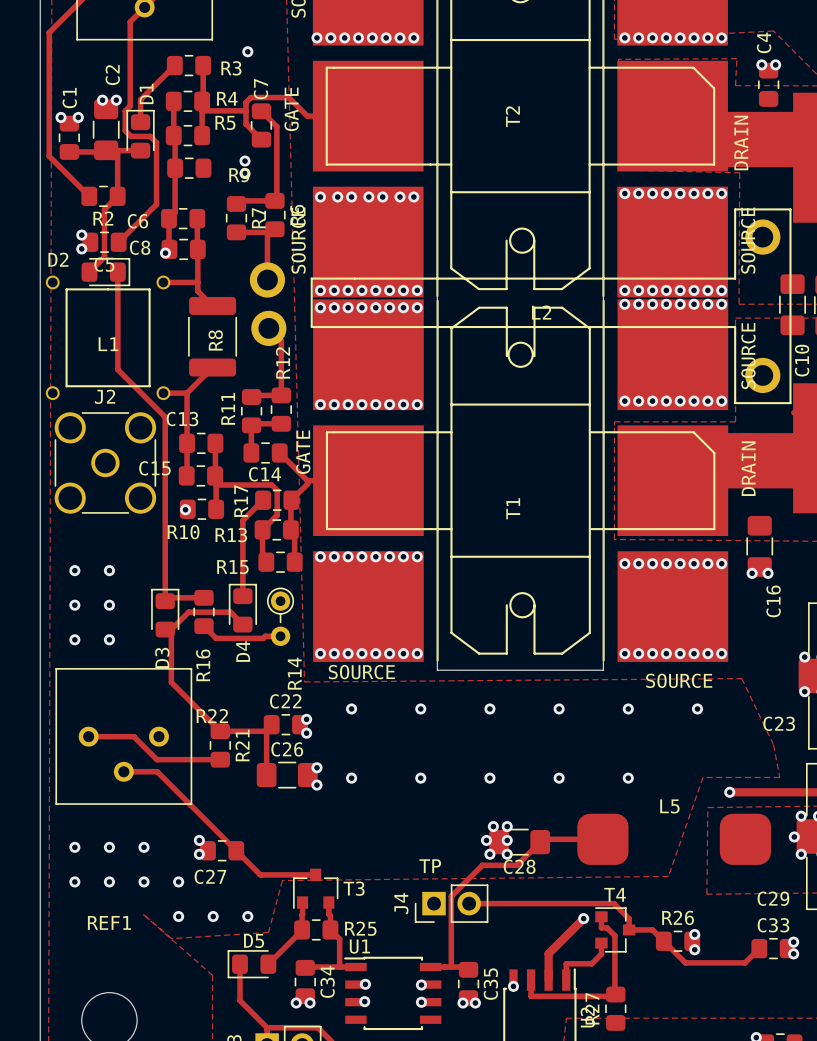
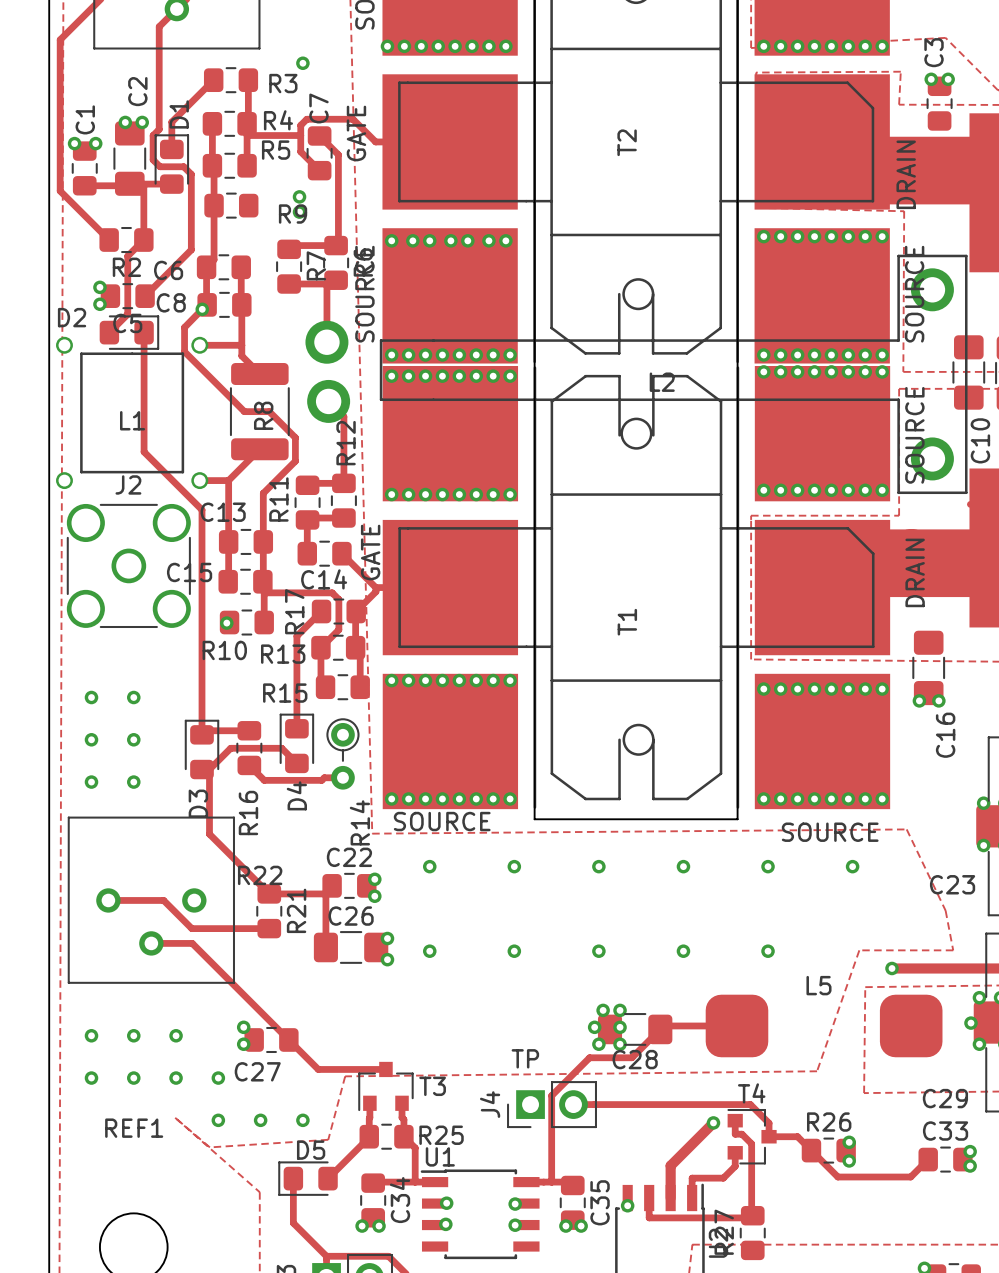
C4 name: C4 (764, 42) -> C3 (934, 52)
track: none -> (202, 309) (184, 327) (184, 351) (244, 411) (269, 411) (295, 437) (295, 461) (263, 493) (263, 541)

